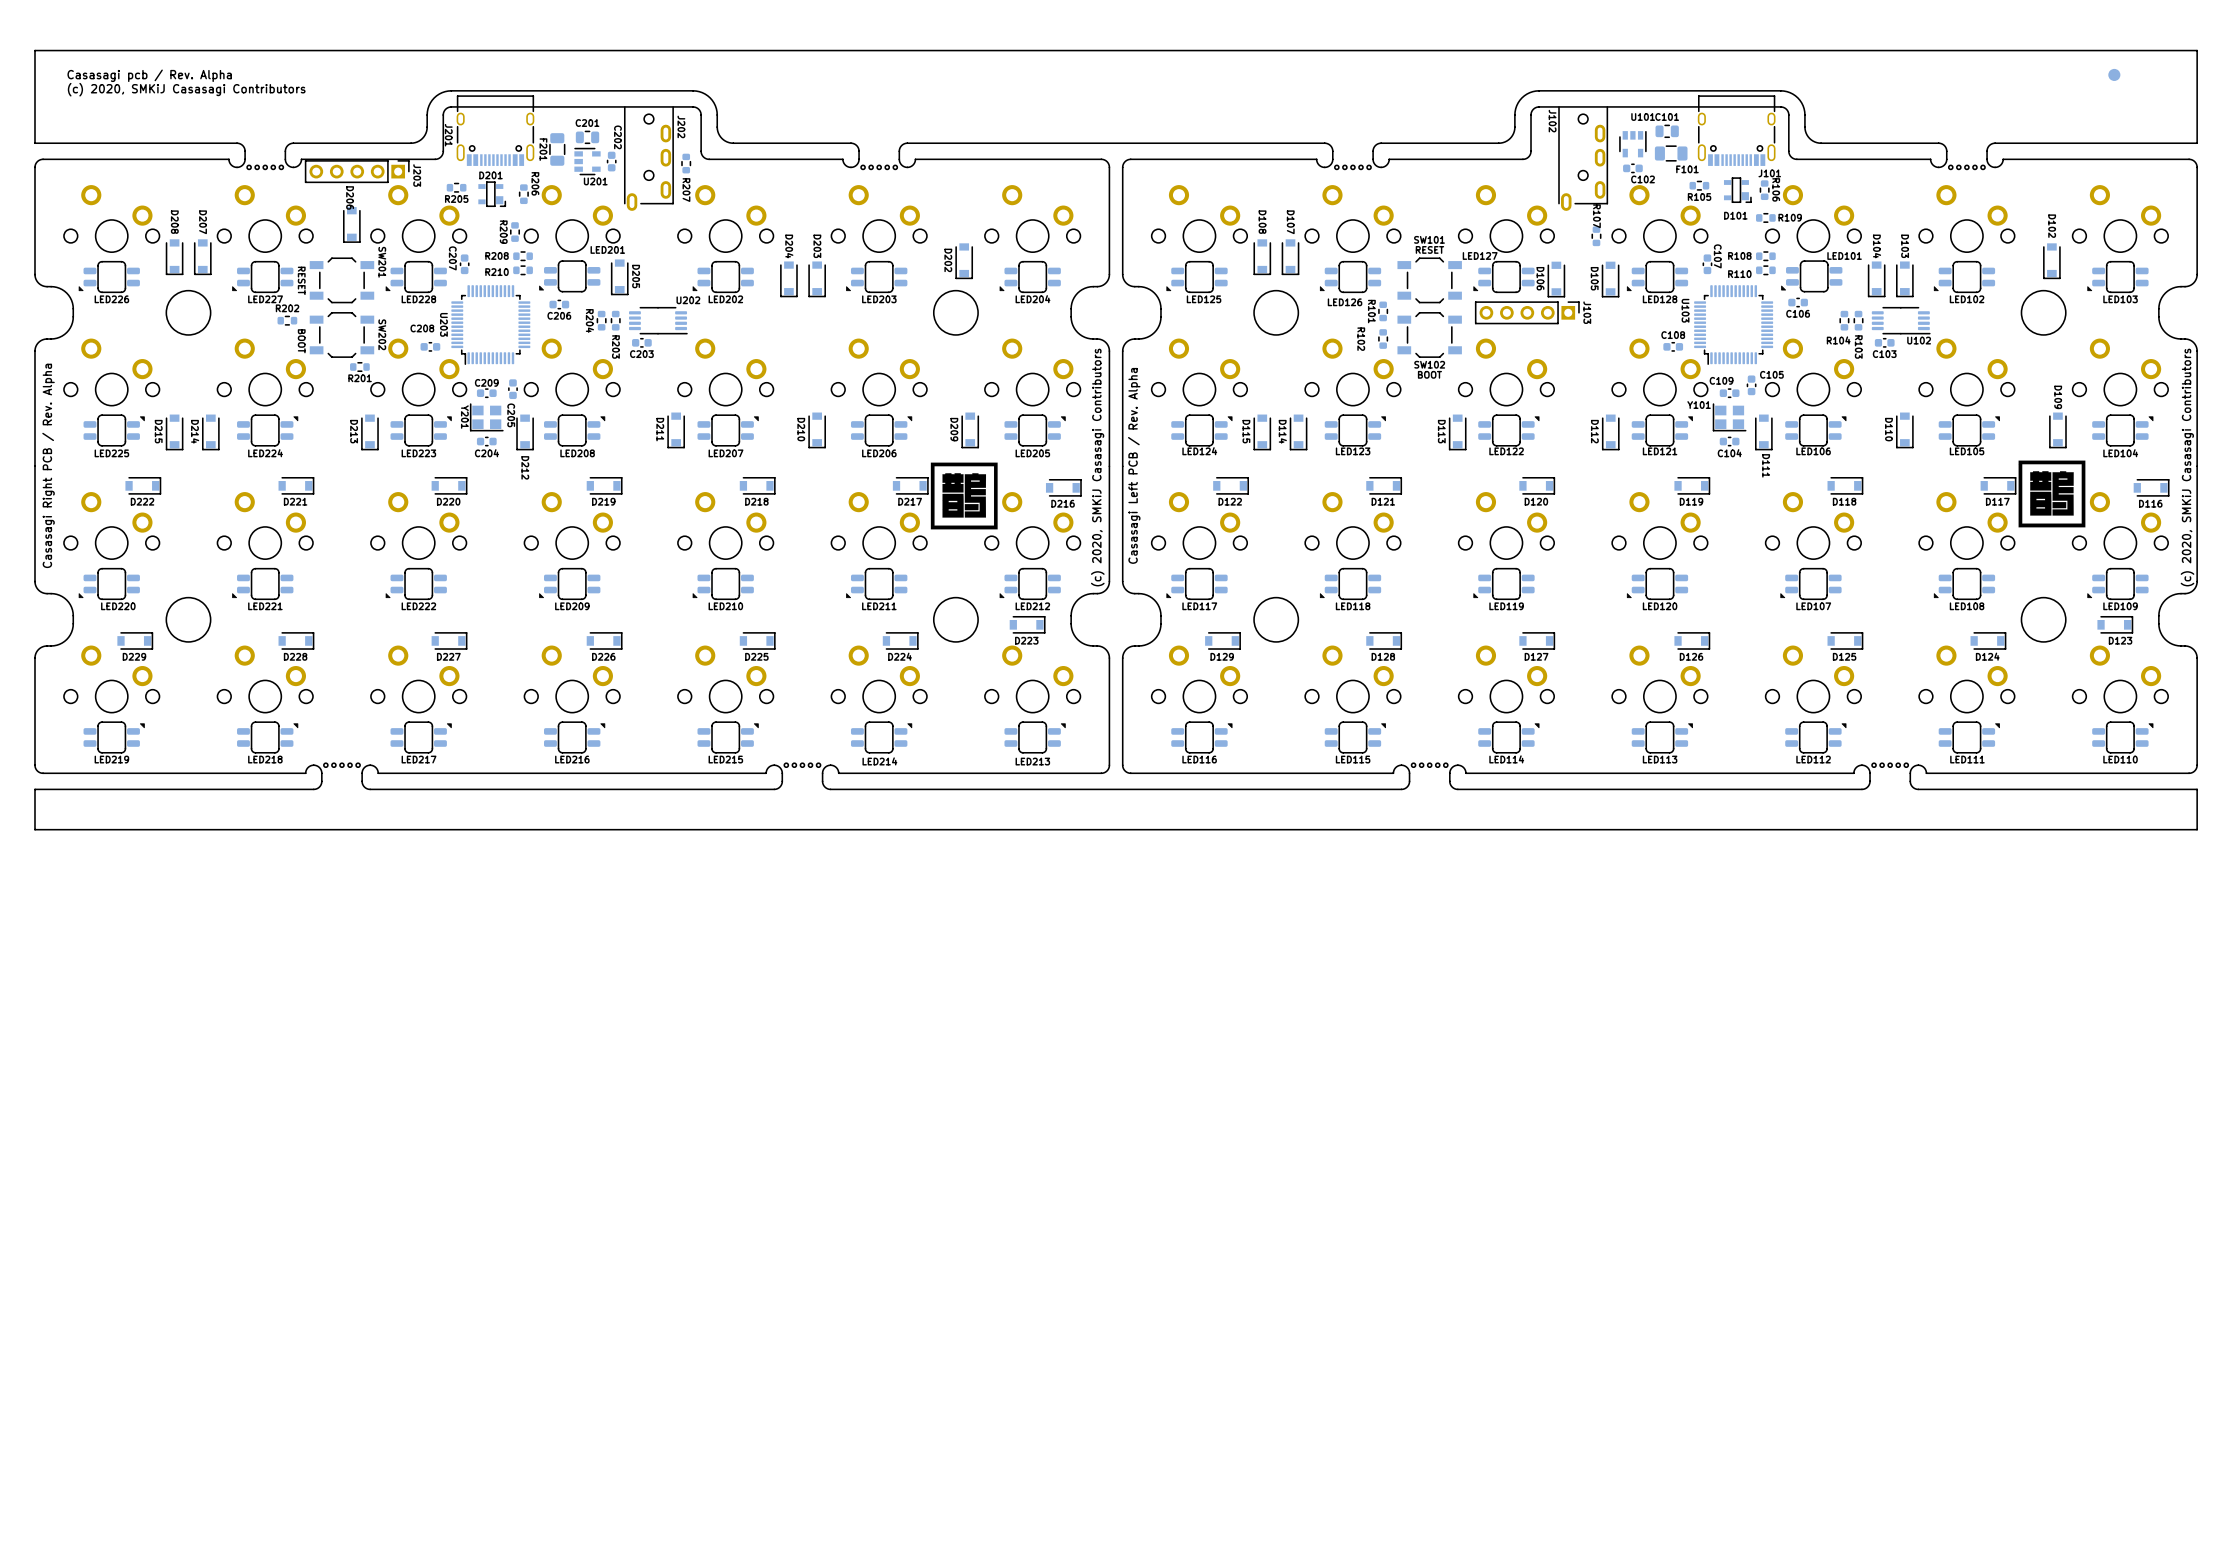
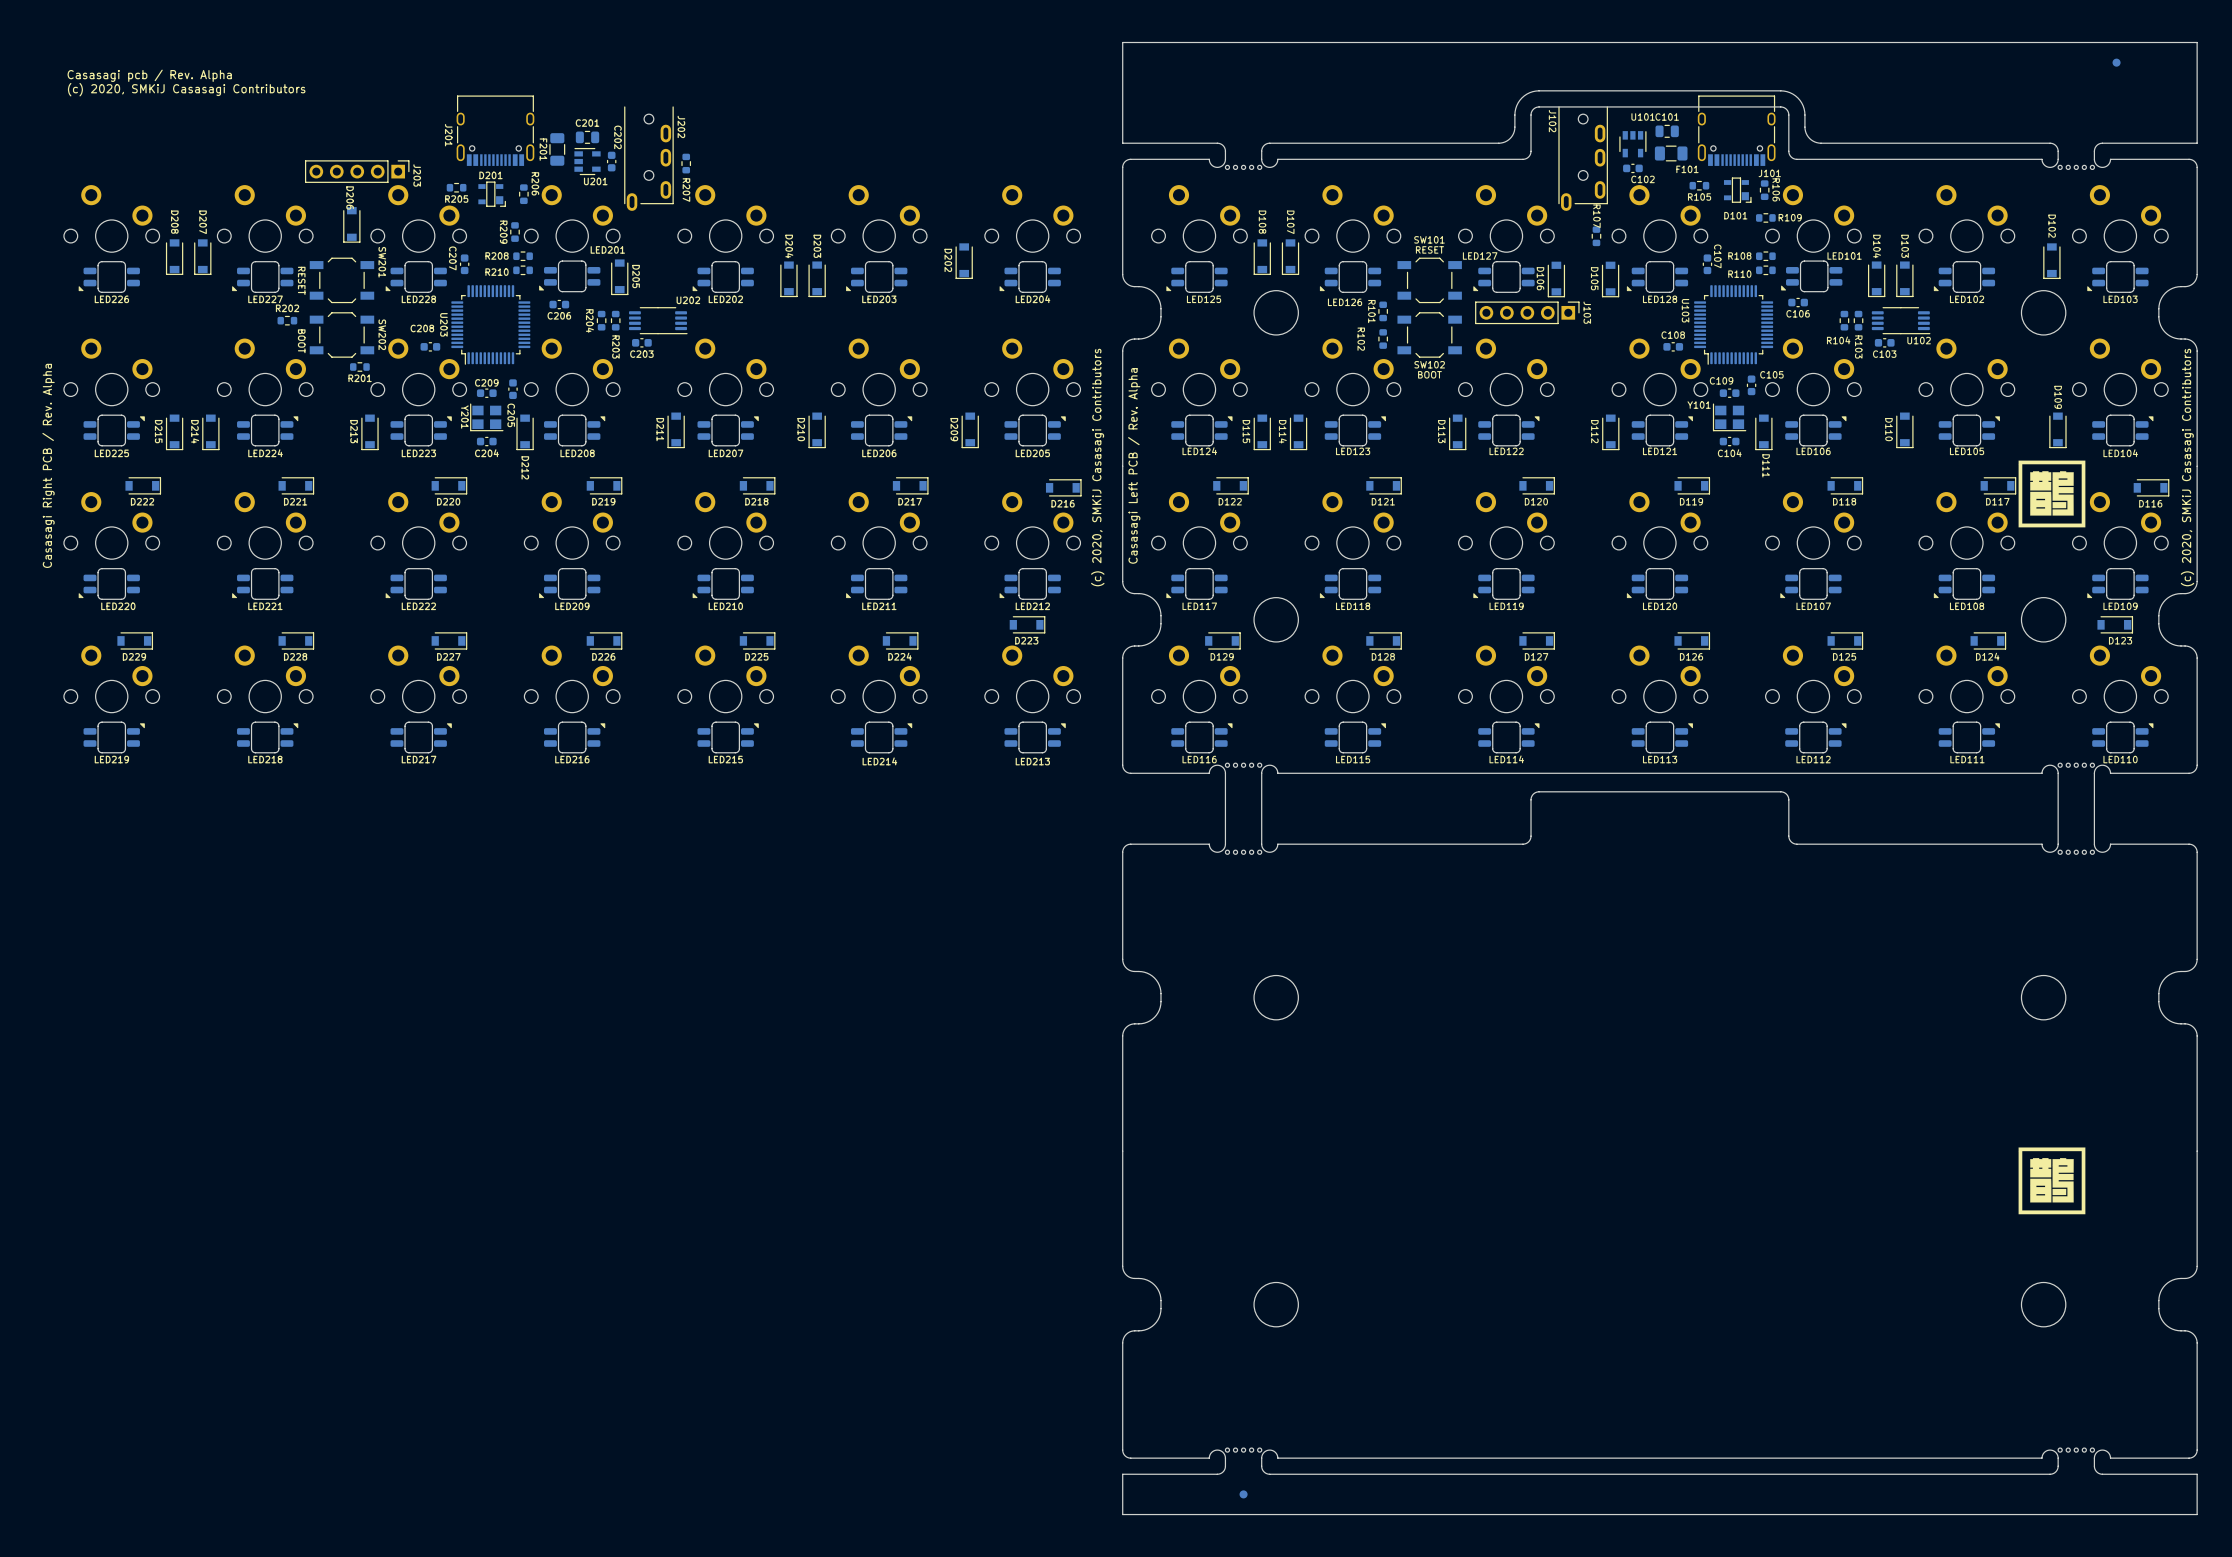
part: none -> (2116, 62)
part: (2114, 74) -> none
board edge: (693, 90) (448, 91) (436, 95) (430, 102) (427, 111) (426, 131) (423, 136) (417, 141) (292, 143) (285, 148) (285, 160) (287, 165) (293, 167) (299, 165) (301, 159) (437, 159) (443, 152) (443, 112) (450, 107) (693, 106) (697, 108) (700, 112) (701, 152) (707, 159) (842, 159) (845, 165) (850, 167) (858, 162) (858, 149) (852, 143) (727, 141) (721, 138) (717, 131) (717, 111) (713, 102) (705, 94) (693, 90) -> none
board edge: (1122, 143) (907, 143) (901, 145) (899, 151) (900, 163) (907, 167) (913, 165) (915, 159) (1101, 159) (1108, 164) (1109, 277) (1101, 285) (1087, 287) (1079, 291) (1072, 300) (1071, 308) (1071, 322) (1077, 332) (1087, 338) (1103, 340) (1109, 349) (1109, 583) (1103, 591) (1087, 594) (1079, 598) (1072, 607) (1071, 615) (1071, 629) (1077, 639) (1087, 645) (1101, 646) (1109, 654) (1108, 768) (1101, 773) (838, 773) (836, 767) (830, 765) (823, 770) (823, 784) (830, 789) (1401, 789) (1407, 787) (1409, 781) (1407, 767) (1398, 765) (1393, 773) -> (1465, 773) (1393, 773)
board edge: (1269, 143) (1217, 143) -> (1269, 143) (1262, 148) (1262, 163) (1266, 166) (1271, 167) (1276, 164) (1277, 159)
board edge: (1324, 143) (1332, 148) (1331, 163) (1327, 166) (1322, 167) (1318, 164) (1316, 159) -> (1389, 159) (1316, 159)
board edge: (1381, 143) (1373, 148) (1374, 163) (1378, 166) (1383, 167) (1387, 164) (1389, 159) -> (1381, 143) (1324, 143)
board edge: (1938, 143) (1946, 148) (1945, 163) (1941, 166) (1936, 167) (1932, 164) (1930, 159) -> (2003, 159) (1930, 159)
board edge: (1995, 143) (1987, 148) (1988, 163) (1992, 166) (1997, 167) (2001, 164) (2003, 159) -> (1995, 143) (1938, 143)
board edge: (2102, 143) (2050, 143) -> (2102, 143) (2095, 148) (2095, 163) (2099, 166) (2104, 167) (2108, 164) (2110, 159)
board edge: (2197, 143) (2197, 50) (34, 50) (34, 143) (237, 143) (242, 145) (245, 151) (244, 163) (237, 167) (231, 165) (228, 159) (43, 159) (37, 161) (34, 167) (35, 277) (42, 285) (56, 287) (64, 291) (71, 300) (73, 308) (72, 322) (68, 330) (59, 337) (47, 339) -> (2197, 143) (2197, 42) (1122, 42) (1122, 143)
board edge: (1277, 159) (1209, 159) -> (1217, 143) (1224, 148) (1224, 163) (1220, 166) (1215, 167) (1210, 164) (1209, 159)
board edge: (2110, 159) (2042, 159) -> (2050, 143) (2057, 148) (2057, 163) (2053, 166) (2048, 167) (2043, 164) (2042, 159)
part: (265, 167) -> none
part: (879, 167) -> none
part position: (1352, 167) -> (1243, 167)
part position: (1966, 167) -> (2076, 167)
round board edge: [165, 290, 212, 336] -> none
round board edge: [933, 290, 979, 336] -> none
board edge: (47, 339) (38, 342) (34, 351) (35, 583) (41, 591) (56, 594) (66, 600) (72, 610) (73, 623) (71, 632) (64, 641) (56, 645) (42, 646) (35, 654) (36, 769) (43, 773) (305, 773) (308, 767) (313, 765) (320, 769) (321, 781) (319, 787) (313, 789) (34, 789) (34, 829) (2197, 829) (2197, 789) (1918, 789) (1912, 787) (1910, 781) (1912, 767) (1921, 765) (1926, 773) -> none
drawing: [930, 462, 998, 530] -> none
round board edge: [165, 597, 212, 643] -> none
round board edge: [933, 597, 979, 643] -> none
part: (341, 765) -> none
board edge: (774, 765) (768, 767) (766, 773) (378, 773) (375, 767) (370, 765) (363, 769) (362, 781) (364, 787) (370, 789) (774, 789) (779, 787) (782, 781) (781, 769) (774, 765) -> none
part: (802, 765) -> none
part: none -> (1243, 765)
part: (1429, 765) -> none
part: (1890, 765) -> none
part: none -> (2076, 765)
board edge: none -> (1209, 773) (1211, 767) (1217, 765) (1223, 767) (1225, 772) (1225, 844) (1223, 849) (1214, 851) (1209, 844) (1130, 844) (1125, 846) (1122, 851) (1123, 962) (1130, 970) (1144, 972) (1152, 976) (1158, 982) (1160, 993) (1160, 1007) (1154, 1017) (1144, 1023) (1128, 1025) (1122, 1034) (1122, 1267) (1128, 1276) (1144, 1279) (1154, 1284) (1160, 1294) (1160, 1308) (1158, 1319) (1152, 1326) (1144, 1330) (1130, 1331) (1123, 1339) (1122, 1450) (1125, 1455) (1130, 1458) (1209, 1458) (1212, 1451) (1218, 1450) (1224, 1455) (1225, 1467) (1223, 1471) (1218, 1474) (1122, 1474) (1122, 1514) (2197, 1514) (2197, 1474) (2101, 1474) (2096, 1471) (2094, 1467) (2095, 1455) (2101, 1450) (2107, 1451) (2110, 1458) (2189, 1458) (2196, 1453) (2196, 1339) (2189, 1331) (2175, 1330) (2167, 1326) (2160, 1317) (2158, 1308)
board edge: (1277, 773) (1209, 773) -> (1277, 773) (1275, 767) (1269, 765) (1264, 767) (1261, 772) (1261, 845) (1264, 849) (1268, 852) (1275, 849) (1277, 844) (1525, 843) (1530, 837) (1531, 797) (1534, 793) (1539, 791) (1781, 791) (1788, 797) (1788, 837) (1794, 843) (2042, 844) (2044, 849) (2051, 852) (2055, 849) (2058, 845) (2058, 772) (2055, 767) (2050, 765) (2044, 767) (2042, 773)
board edge: (1853, 773) (1858, 765) (1867, 767) (1870, 773) (1867, 787) (1861, 789) (1457, 789) (1452, 787) (1449, 781) (1452, 767) (1460, 765) (1465, 773) -> (1853, 773) (1926, 773)
board edge: (2110, 773) (2042, 773) -> (2110, 773) (2108, 767) (2102, 765) (2096, 767) (2094, 772) (2094, 844) (2096, 849) (2105, 851) (2110, 844) (2189, 844) (2193, 845) (2196, 850) (2196, 962) (2189, 970) (2175, 972) (2165, 977) (2159, 987) (2158, 1001)
part: none -> (1243, 852)
part: none -> (2076, 852)
round board edge: none -> [1253, 975, 1299, 1021]
round board edge: none -> [2021, 975, 2067, 1021]
board edge: none -> (2158, 1001) (2160, 1010) (2167, 1019) (2175, 1023) (2191, 1025) (2197, 1034) (2197, 1266) (2195, 1272) (2191, 1276) (2175, 1279) (2165, 1284) (2159, 1294) (2158, 1308)
drawing: none -> [2018, 1147, 2086, 1215]
round board edge: none -> [1253, 1282, 1299, 1328]
round board edge: none -> [2021, 1282, 2067, 1328]
part: none -> (1243, 1450)
part: none -> (2076, 1450)
board edge: none -> (2058, 1458) (2057, 1470) (2050, 1474) (1269, 1474) (1264, 1471) (1261, 1466) (1262, 1454) (1269, 1450) (1275, 1452) (1277, 1458) (2042, 1458) (2044, 1452) (2050, 1450) (2055, 1452) (2058, 1458)
part: none -> (1243, 1494)

